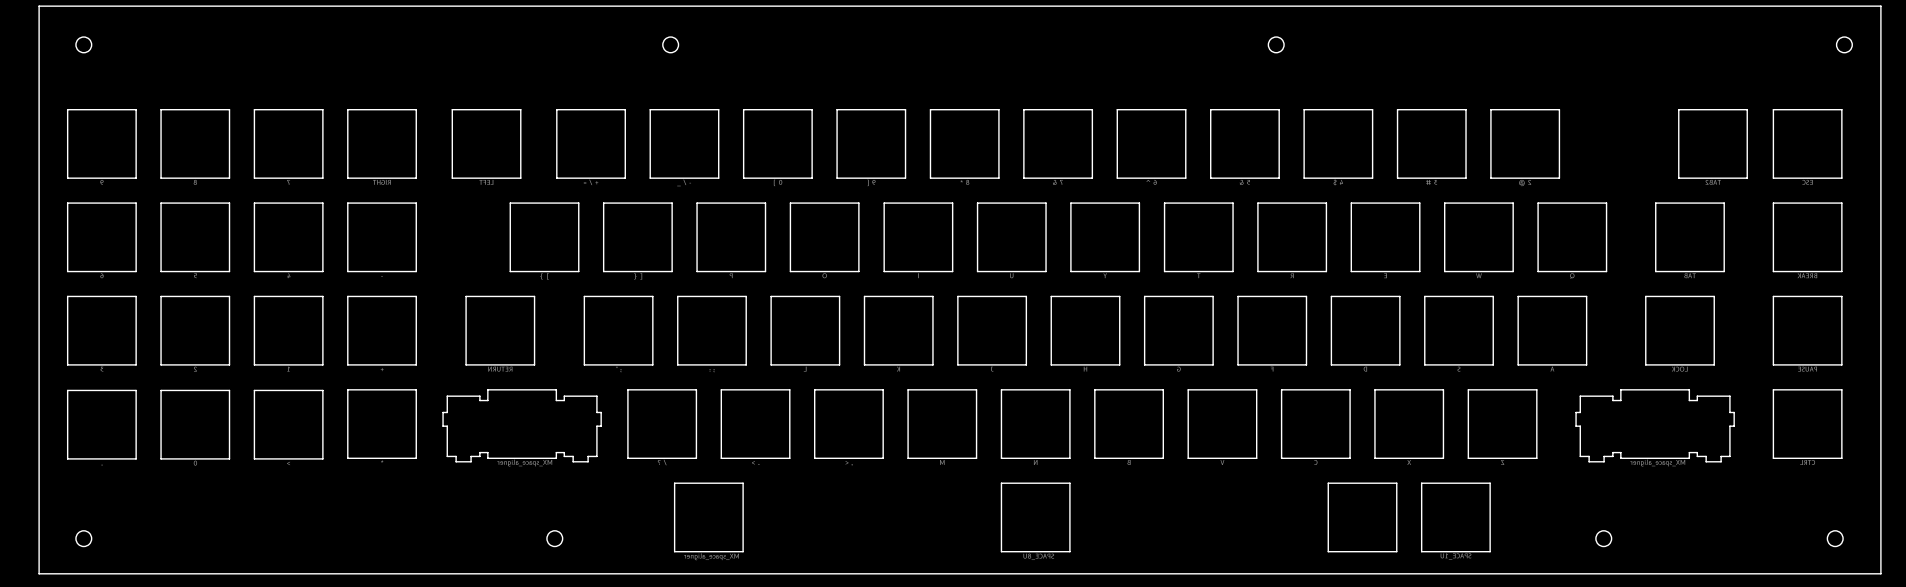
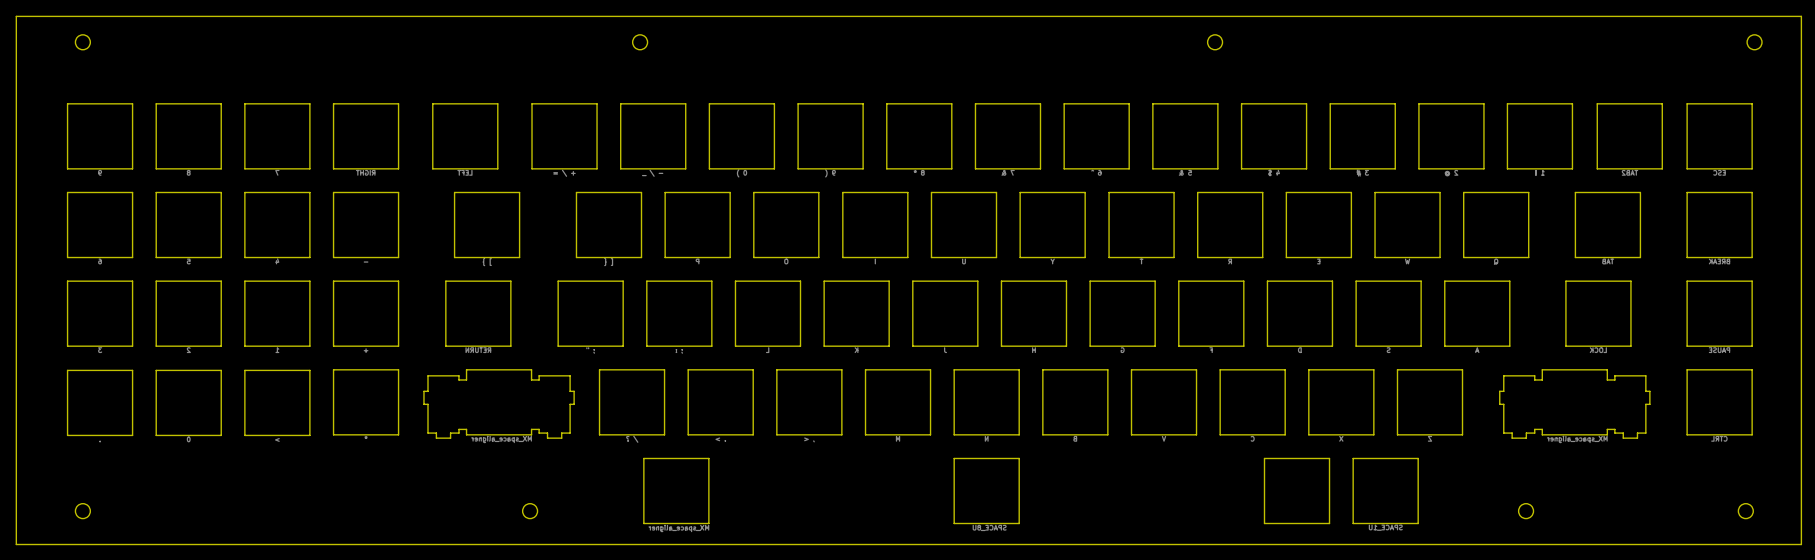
drawing: none -> [1507, 103, 1573, 170]
drawing position: (544, 237) -> (487, 225)
board edge: (1880, 573) (1880, 6) (39, 6) (39, 573) -> (1789, 544) (1801, 544) (1801, 16) (16, 16) (16, 544) (40, 544)

